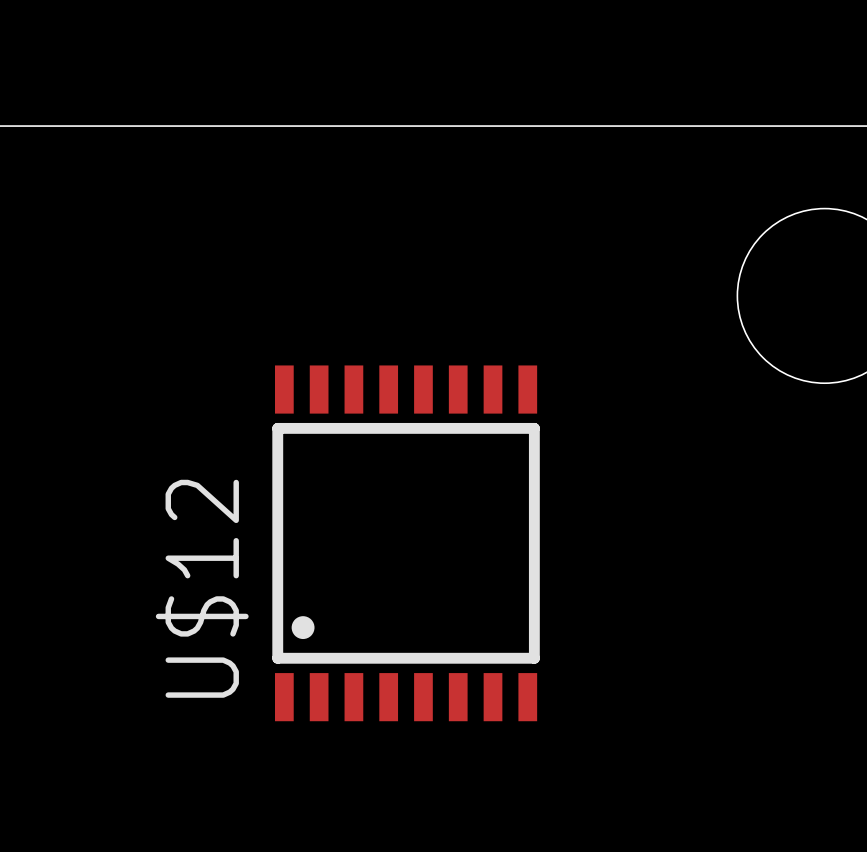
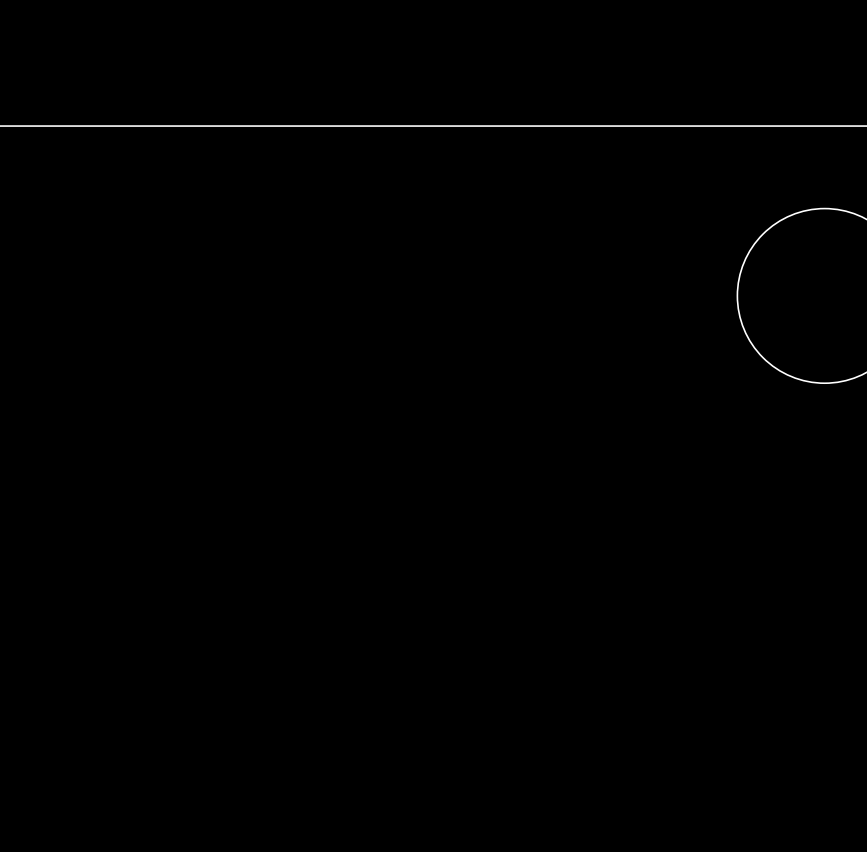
U$12: (406, 543) -> none

